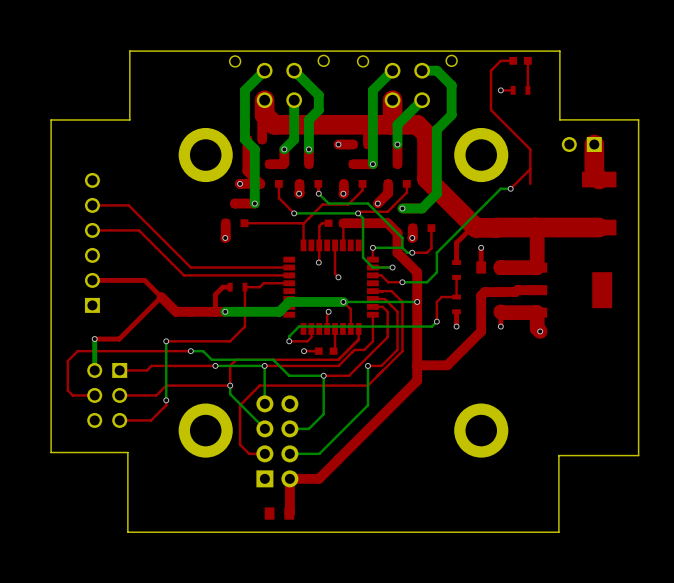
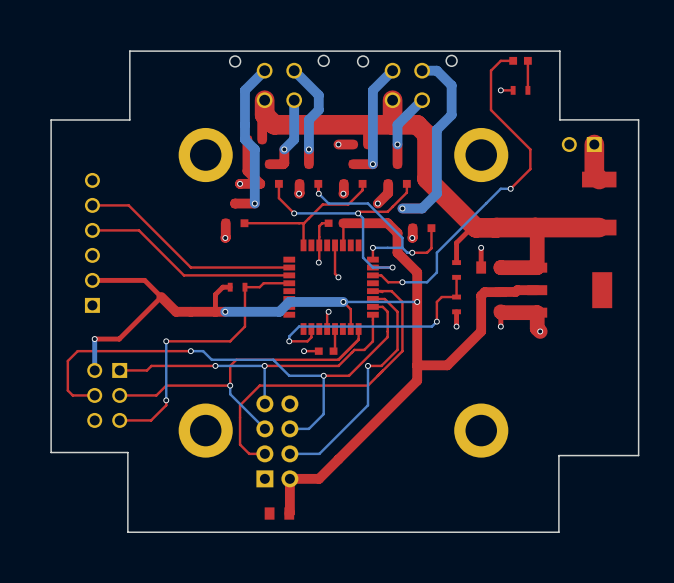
top track: (530, 169) (530, 183) -> none

